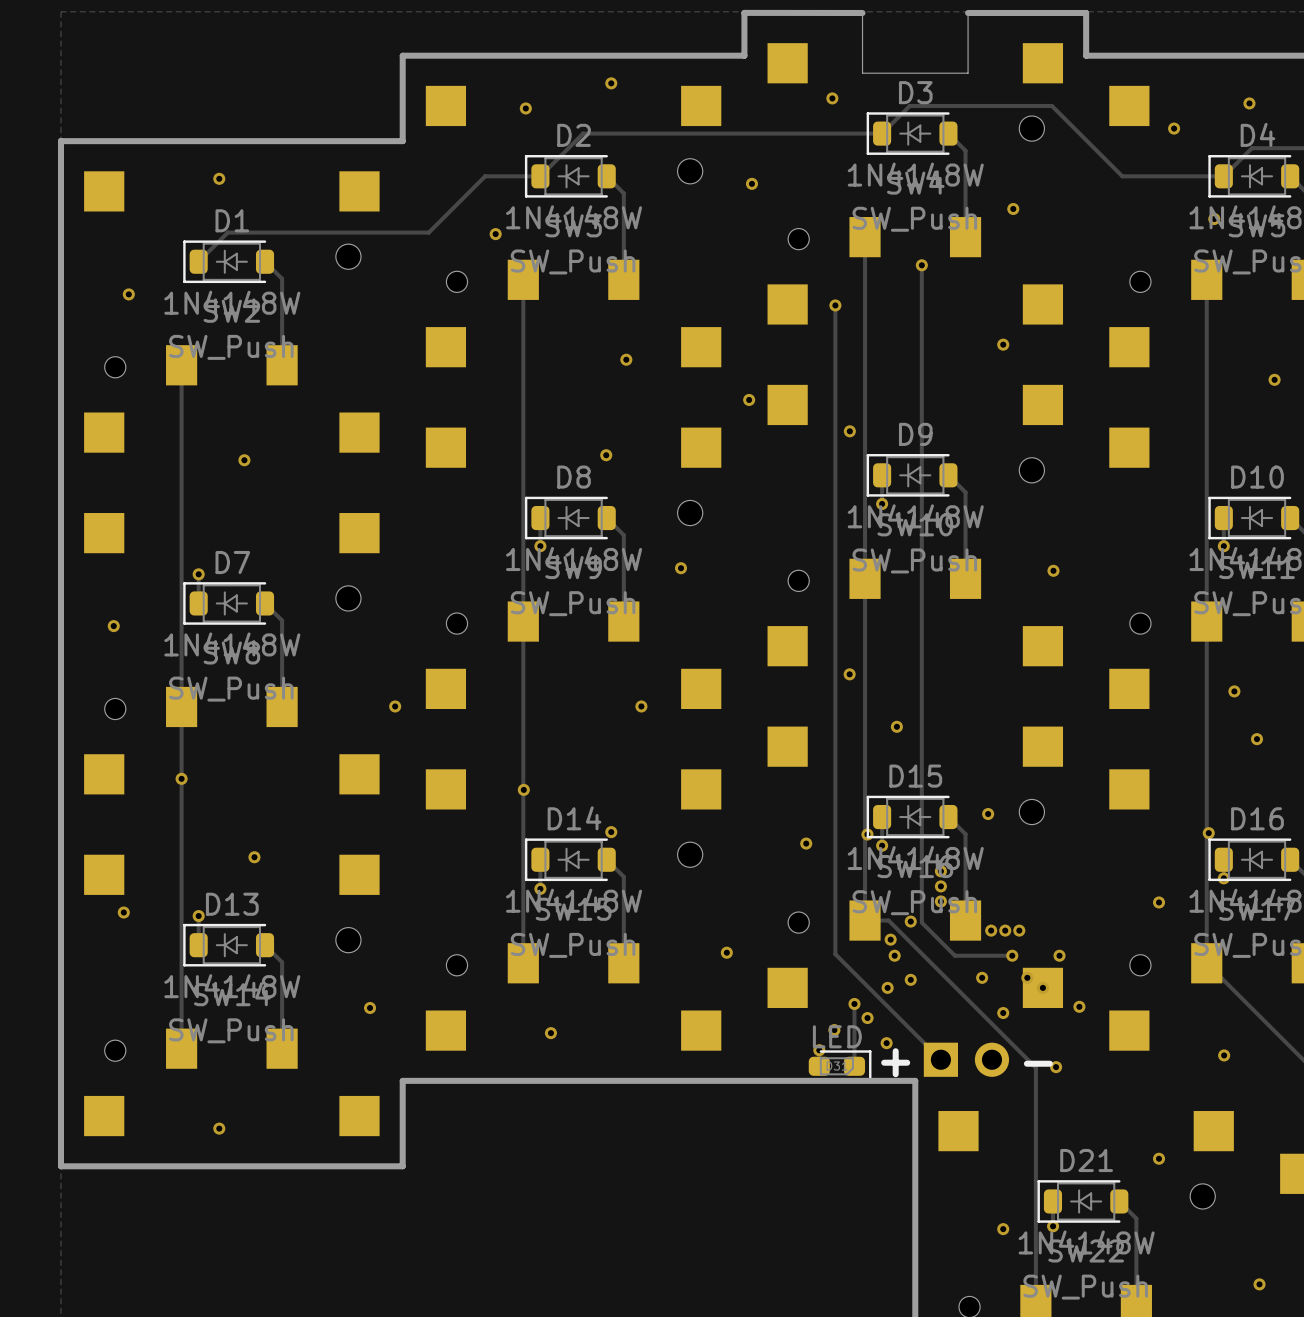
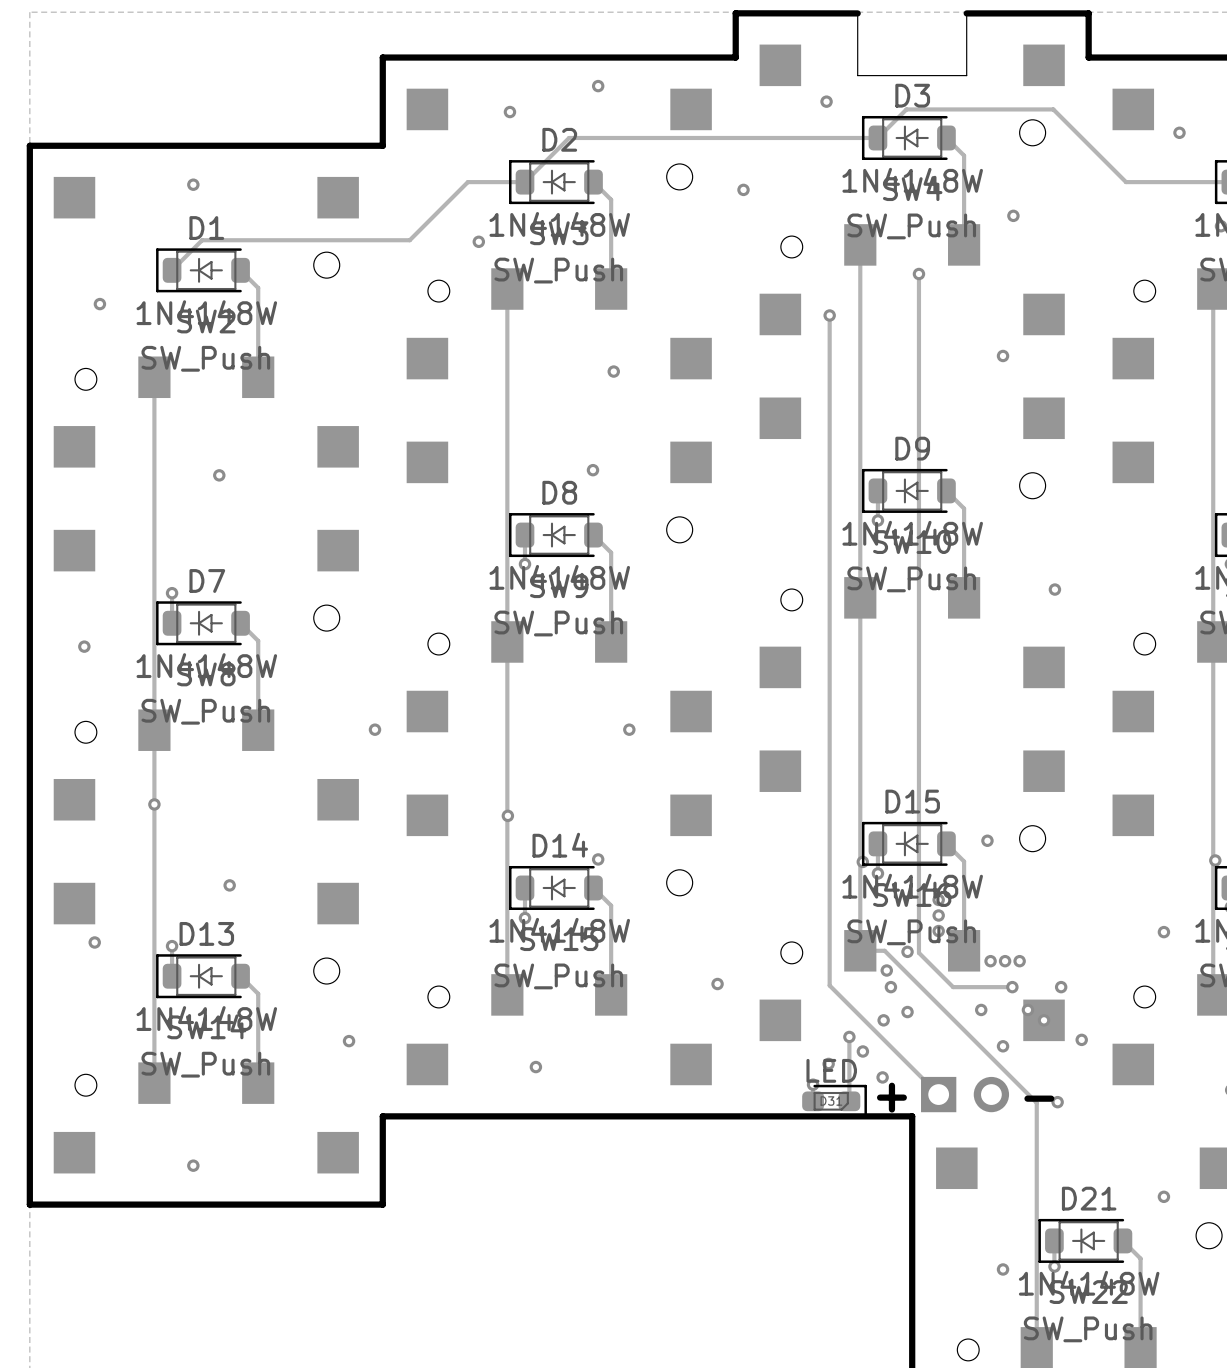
via: (749, 399) -> none
via: (849, 431) -> none
via: (681, 568) -> none
via: (849, 674) -> none
via: (896, 726) -> none
via: (806, 843) -> none

